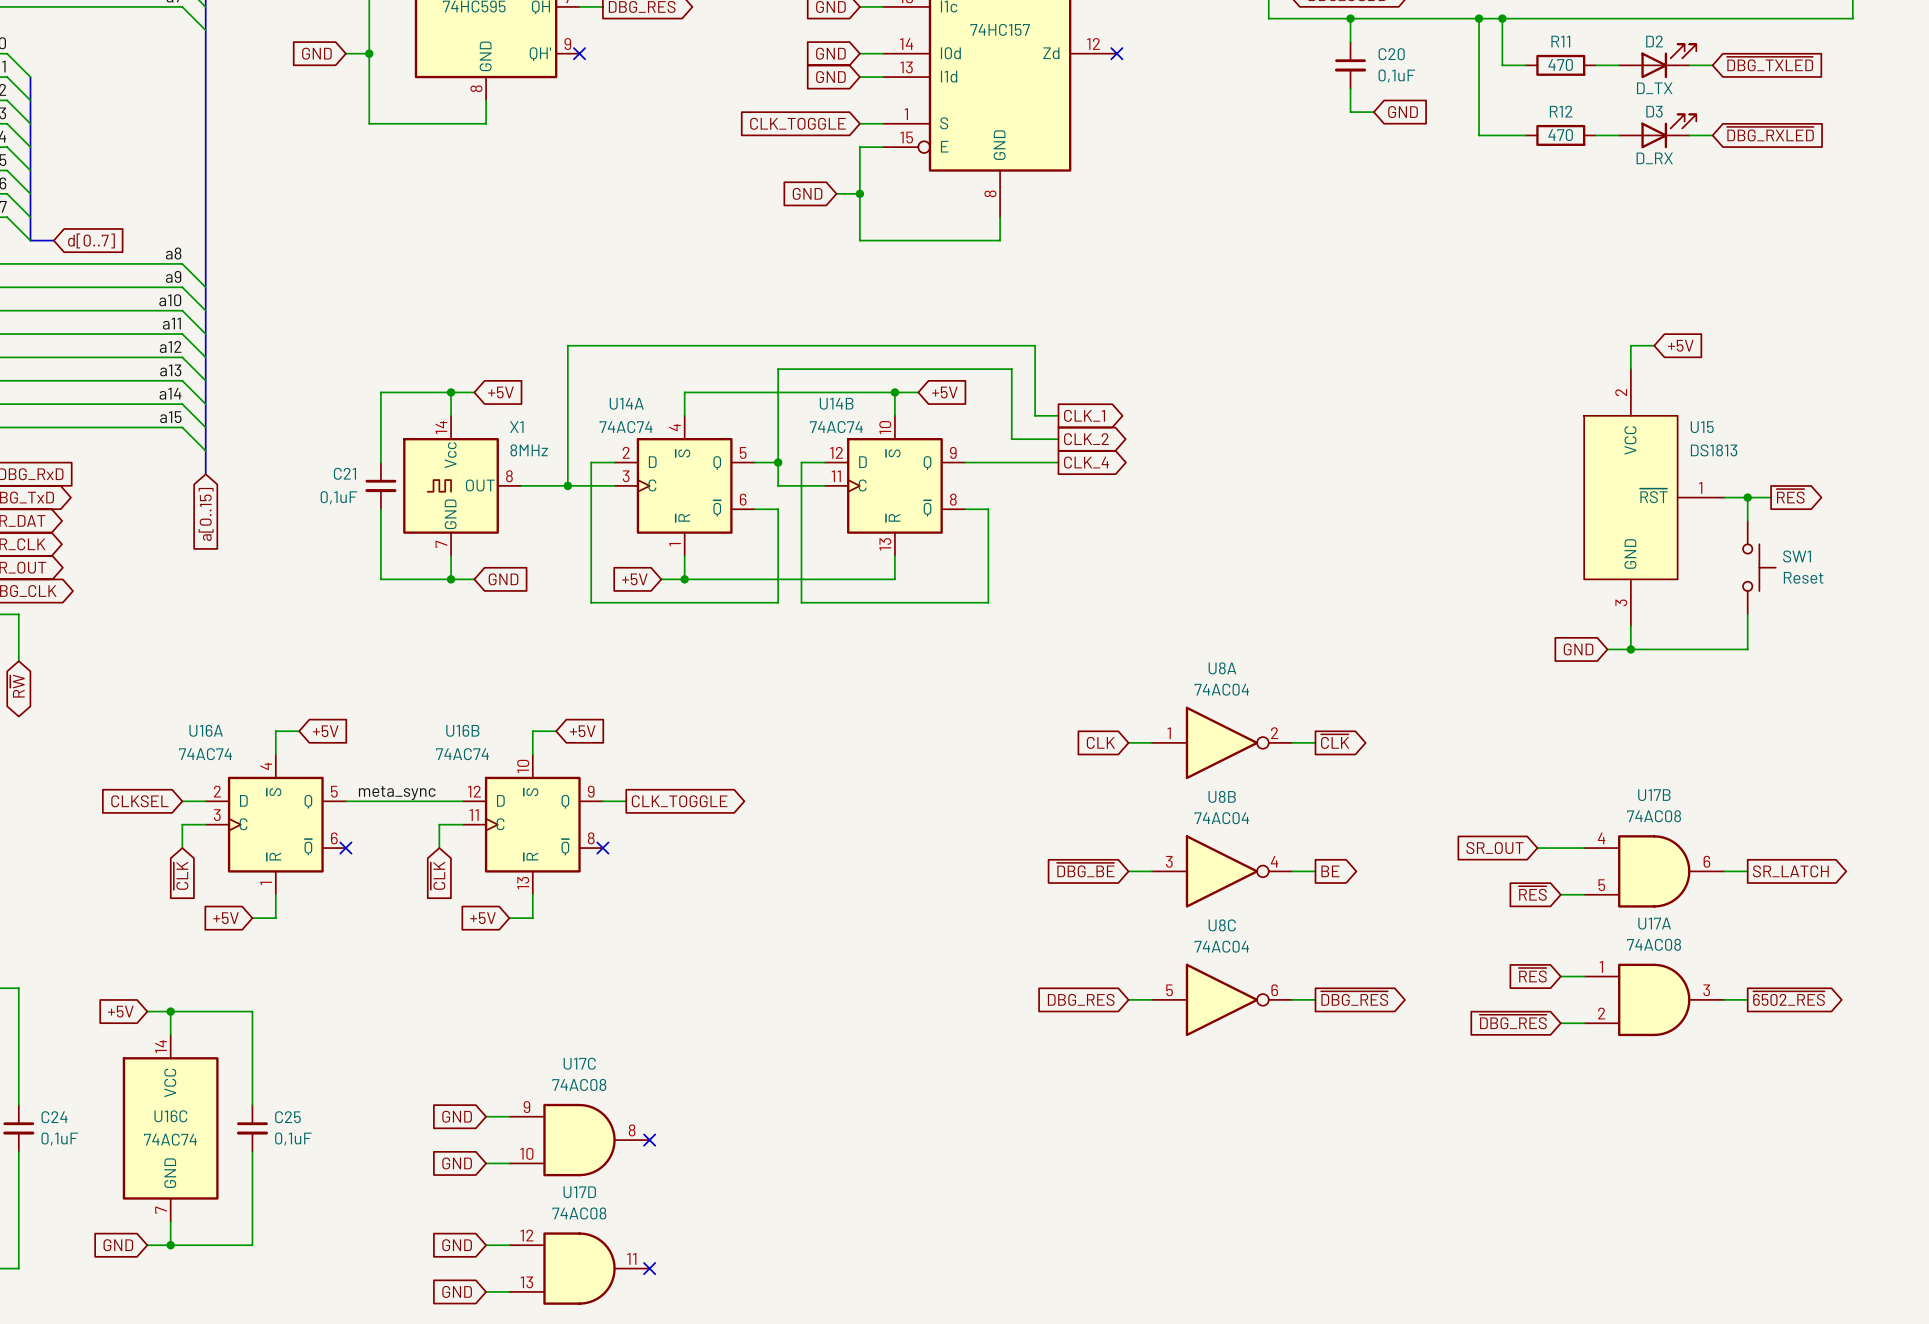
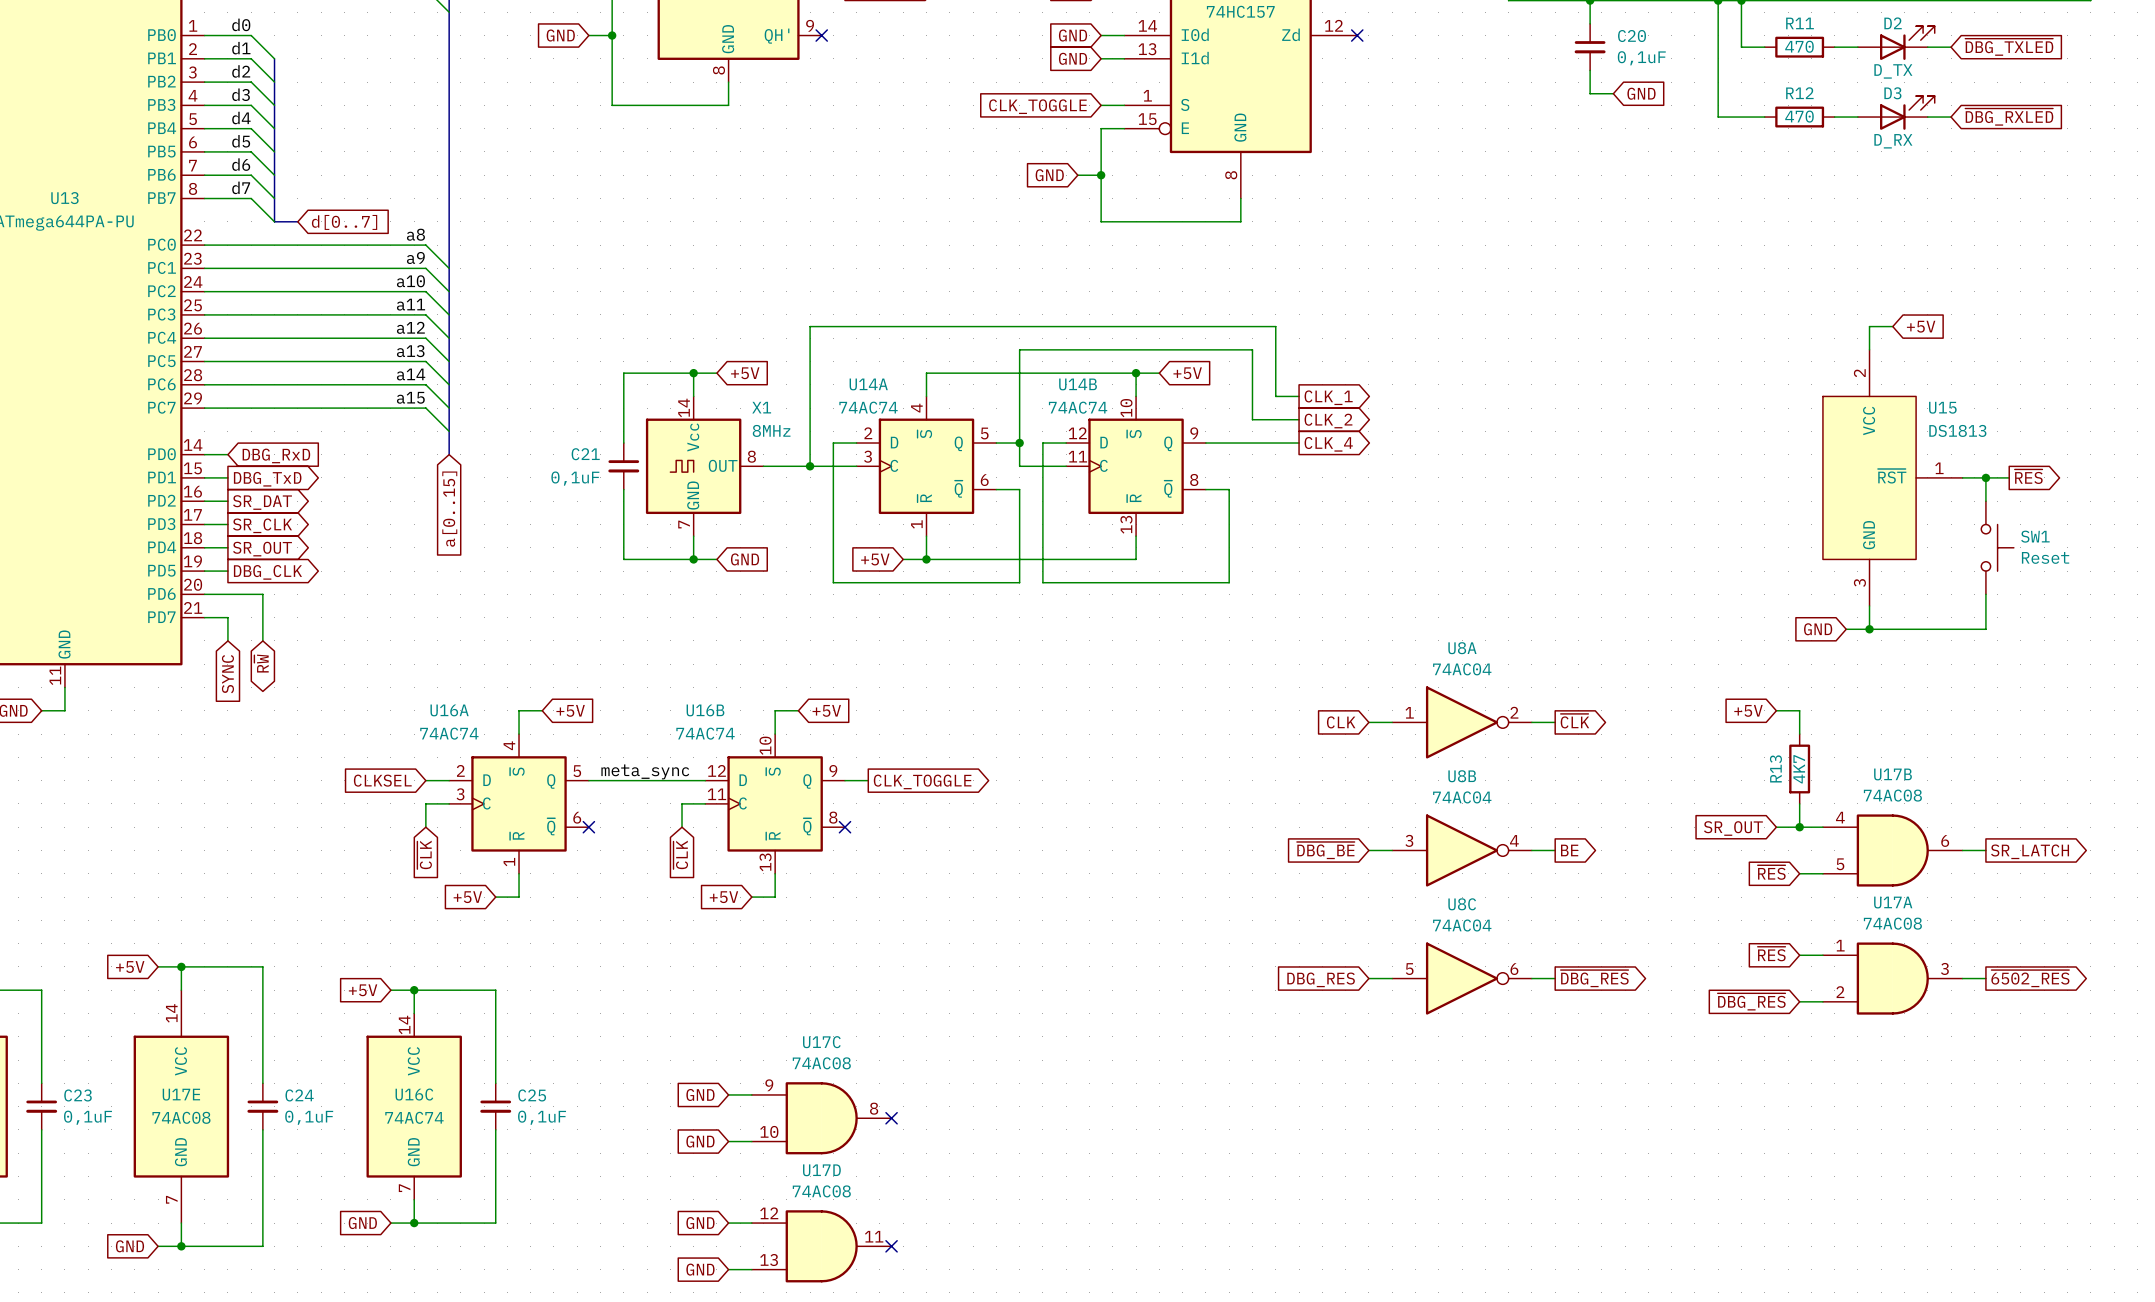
global label: none -> +5V (1748, 710)
wire: none -> (1776, 710) (1799, 710) (1799, 734)
R13: none -> 4K7 (1799, 768)
wire: none -> (1799, 803) (1799, 827)
junction: none -> (1799, 827)

